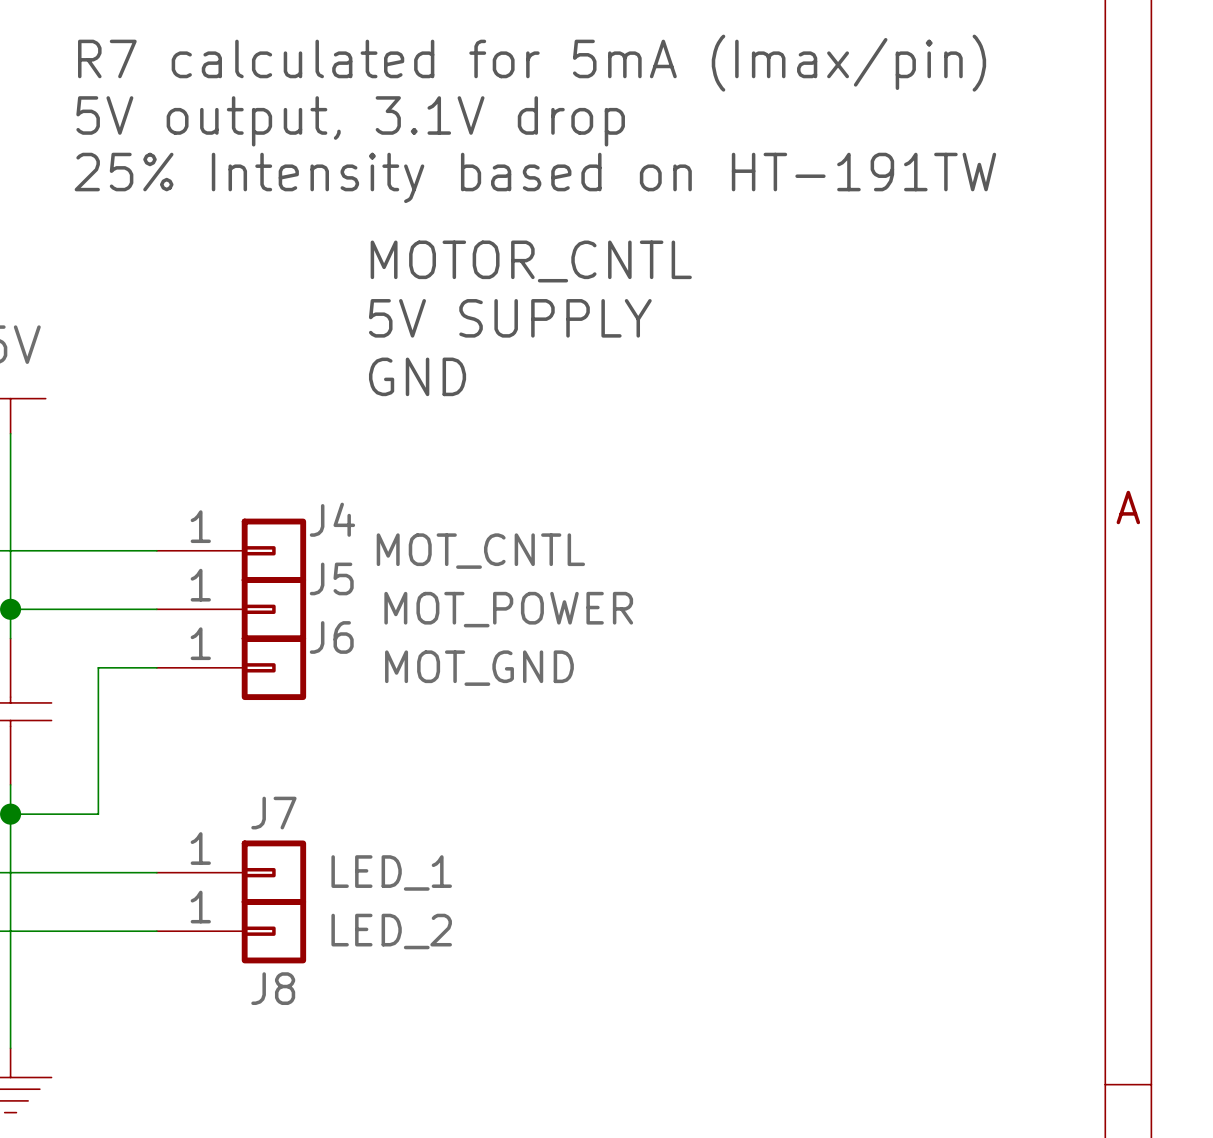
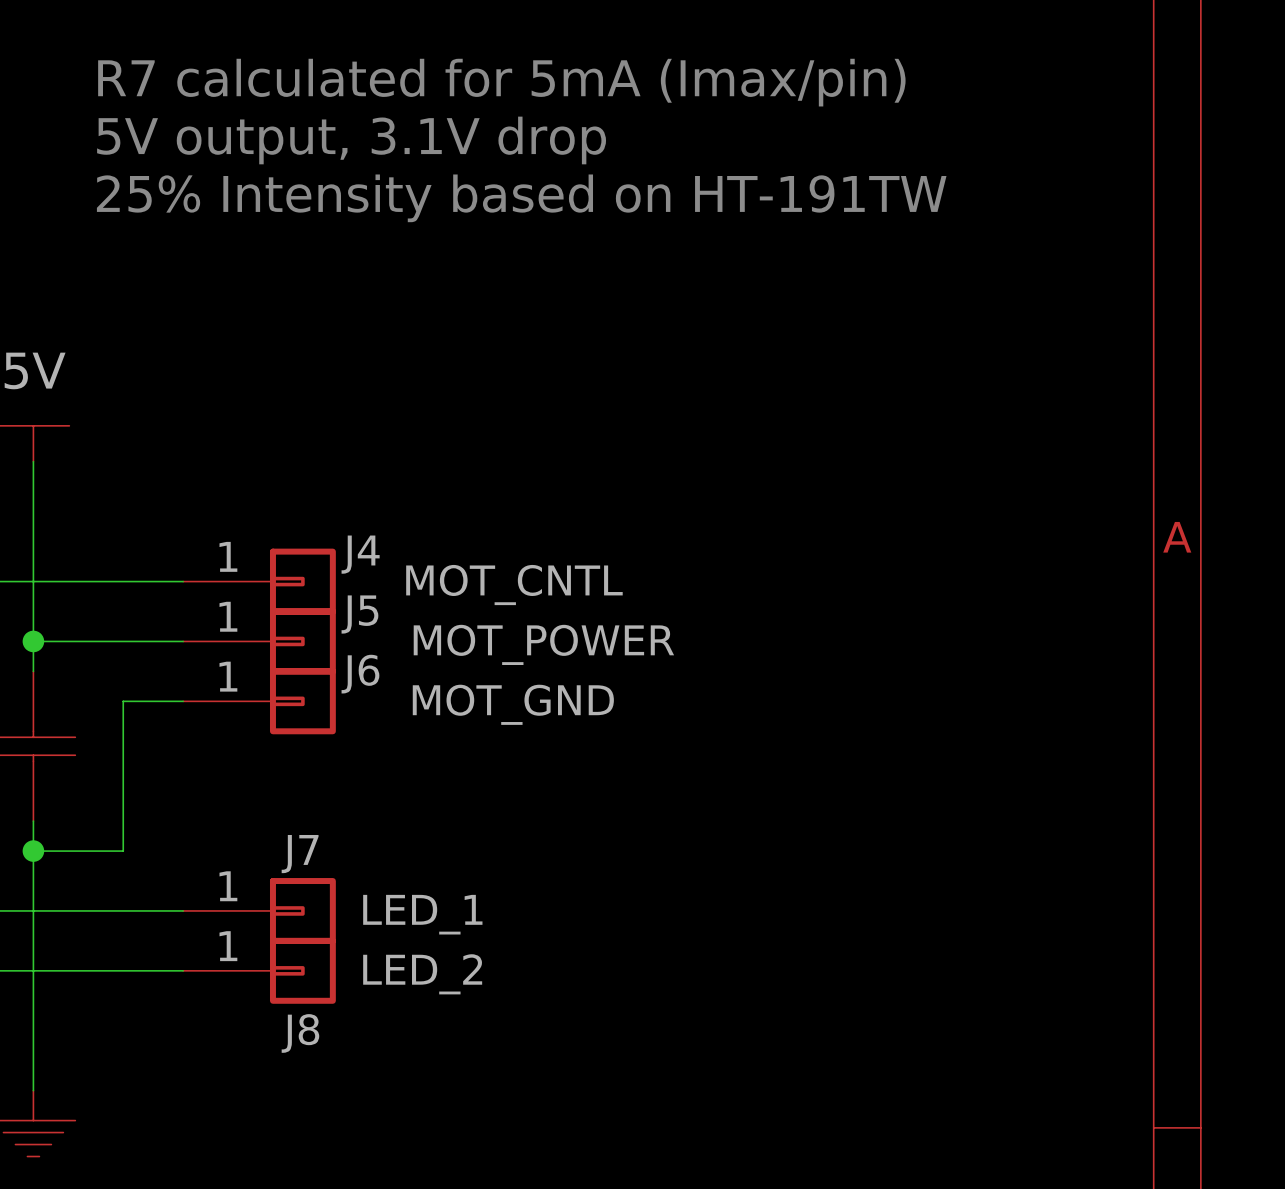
text: MOTOR_CNTL (531, 261) -> none
text: 5V SUPPLY (510, 318) -> none
text: GND (417, 376) -> none

